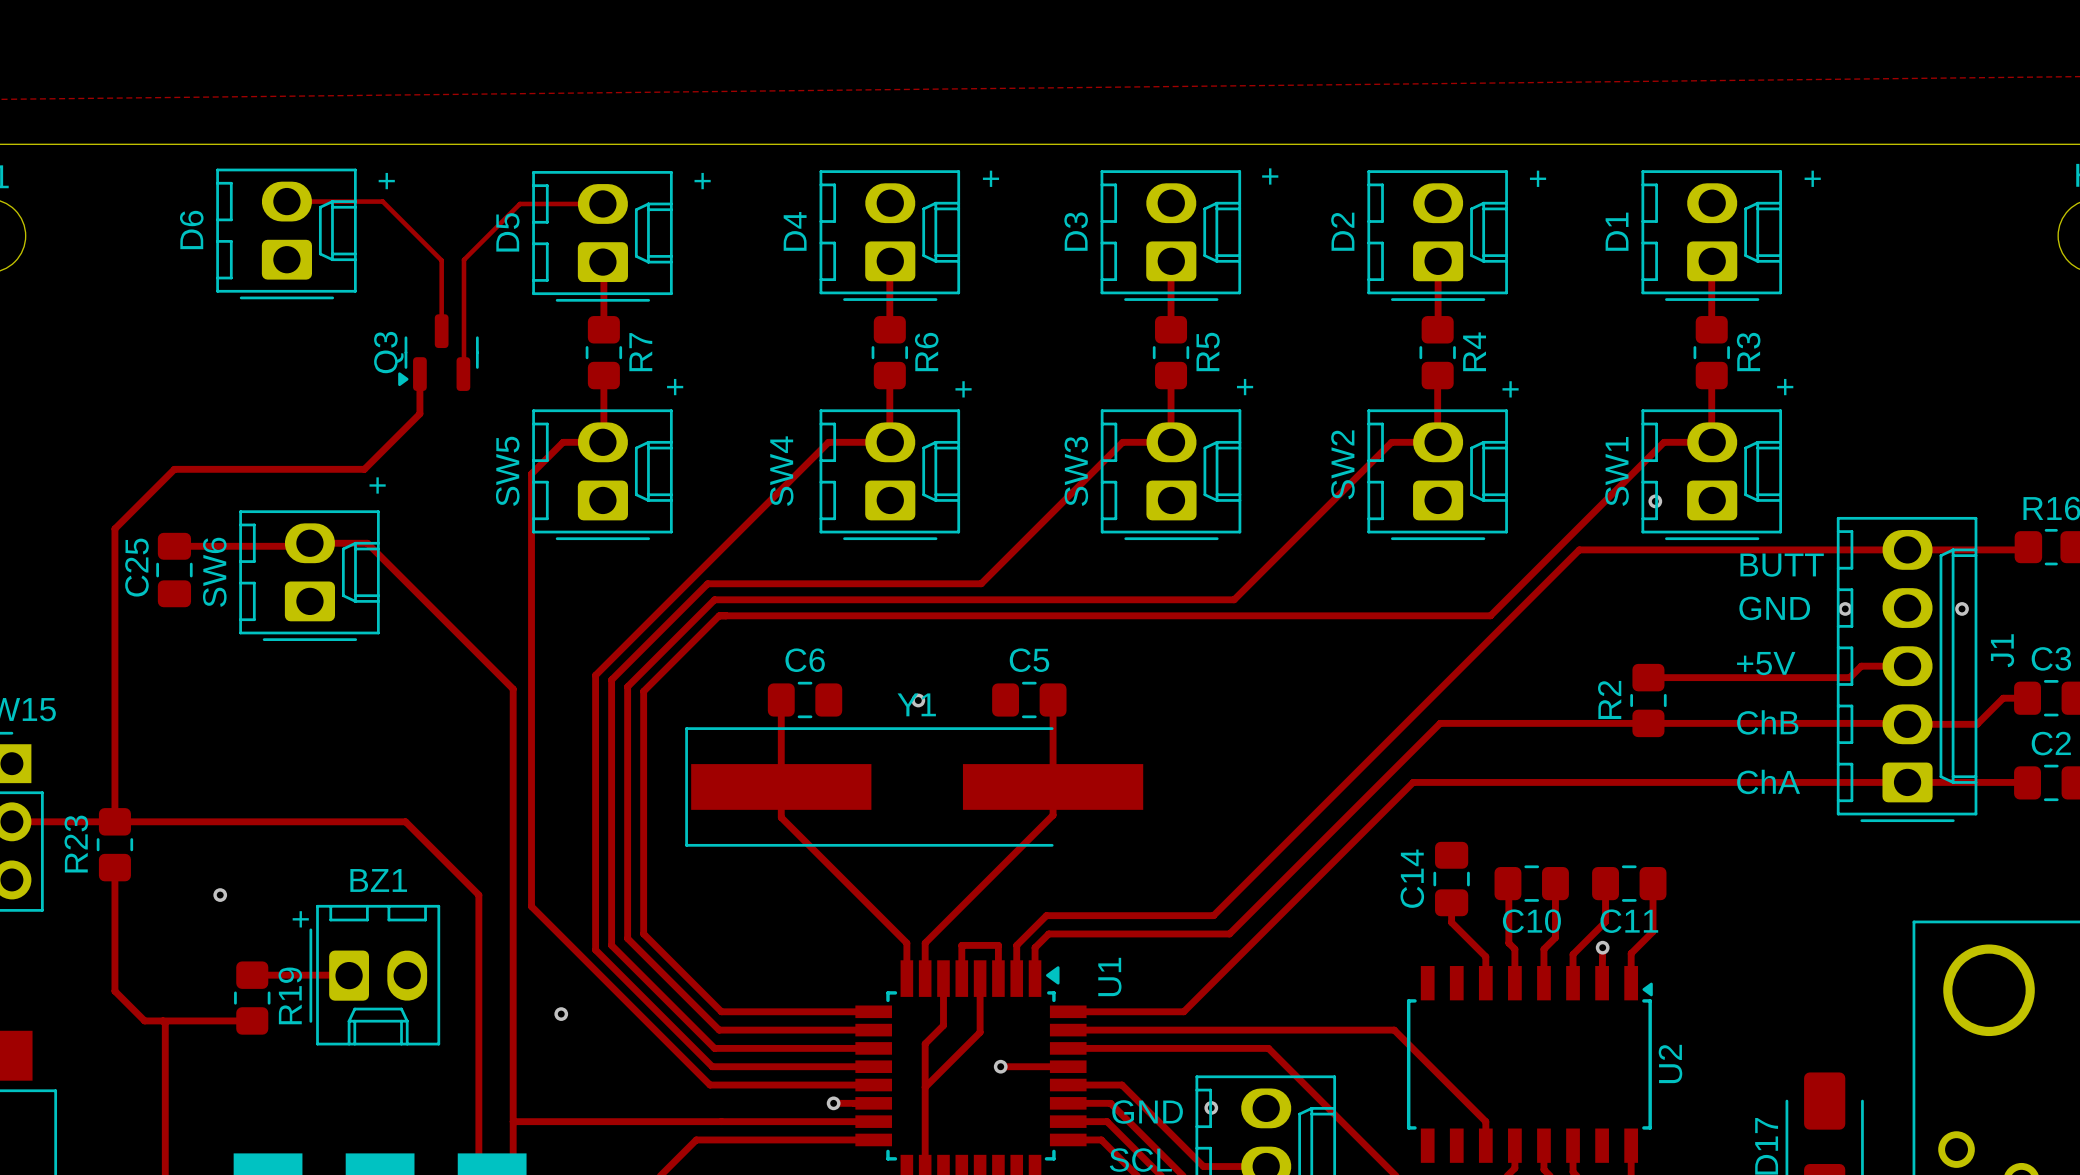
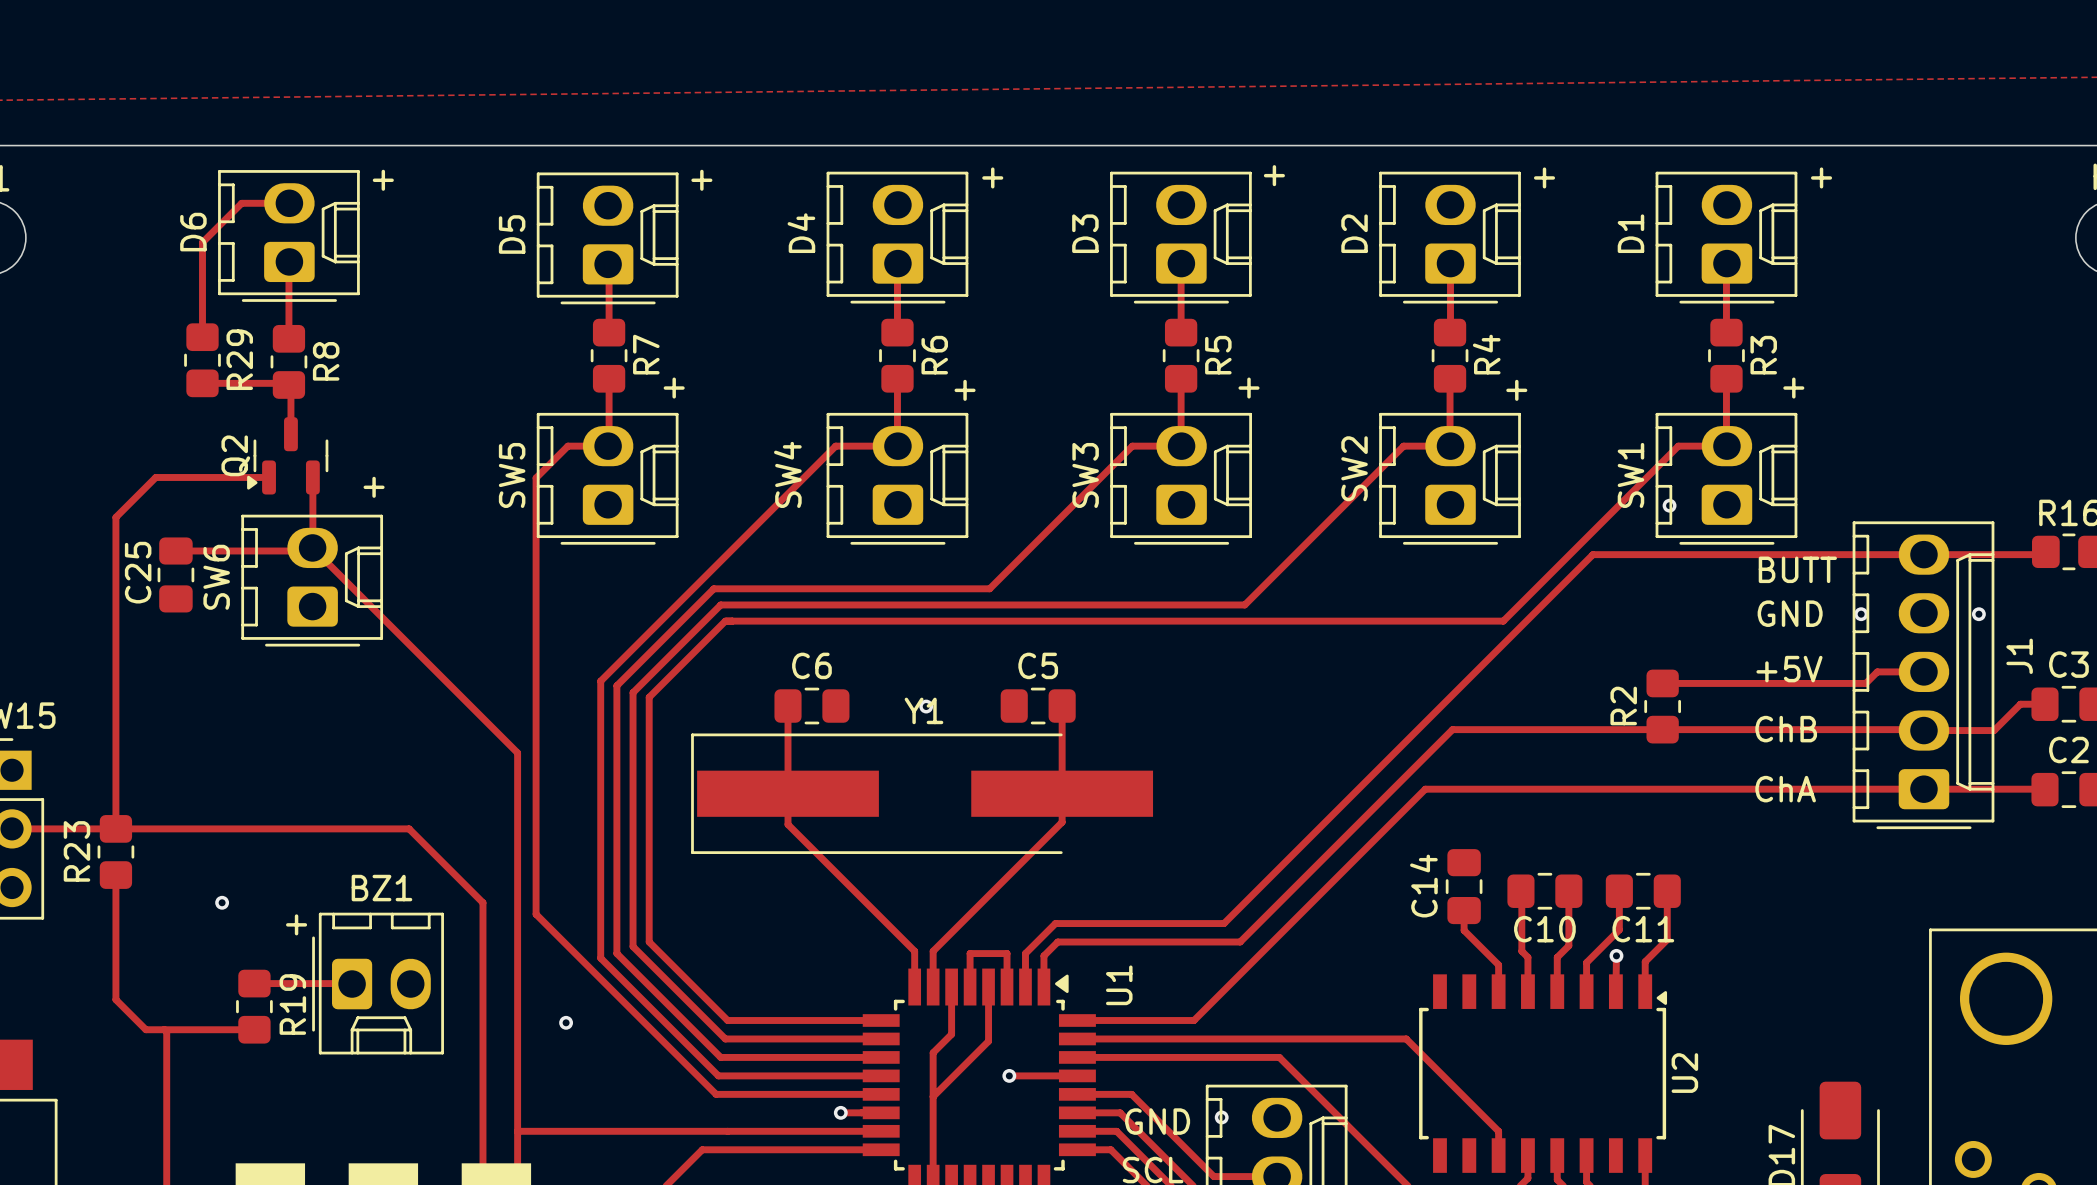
track: (286, 201) (382, 201) (441, 260) (441, 331) -> (289, 203) (241, 203) (202, 242) (202, 337)
track: (602, 203) (519, 203) (463, 259) (463, 378) -> none
track: none -> (288, 262) (288, 338)
Q3: (438, 352) -> none
R29: none -> (202, 360)
R8: none -> (288, 361)
track: (419, 374) (419, 413) (364, 469) (174, 469) (114, 528) -> (269, 477) (155, 477) (115, 517) (115, 533)
track: none -> (202, 383) (287, 383) (290, 387) (290, 434)
Q2: none -> (287, 455)
track: none -> (312, 477) (312, 547)
track: (309, 543) (367, 543) (513, 689) (513, 746) -> (312, 547) (517, 752)

